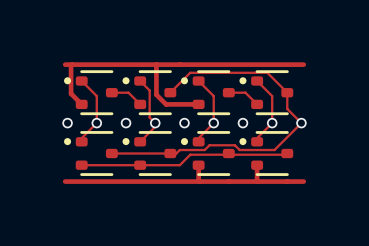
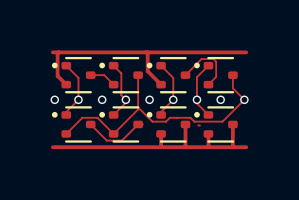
track: (156, 64) (156, 94) (166, 104) (198, 104) -> (147, 52) (147, 71) (161, 84)
track: (248, 72) (190, 72) (170, 92) -> none
track: (263, 72) (267, 72) (287, 92) -> (213, 59) (216, 61) (216, 76) (208, 84)
track: (257, 81) (272, 96) (272, 123) (257, 138) (257, 141) -> (208, 65) (196, 77) (196, 103) (208, 114)
track: (228, 92) (245, 92) (257, 104) -> (185, 75) (201, 59)
track: (187, 150) (179, 150) (176, 153) -> (152, 121) (138, 107)
track: (111, 153) (170, 153) -> (90, 124) (106, 140) (121, 140) (138, 124)
track: none -> (185, 124) (185, 147)
track: (287, 153) (246, 154) -> (232, 124) (232, 147)
track: (244, 154) (190, 154) (179, 165) (81, 165) -> (138, 75) (138, 109) (113, 133) (97, 117) (82, 117) (66, 133)

